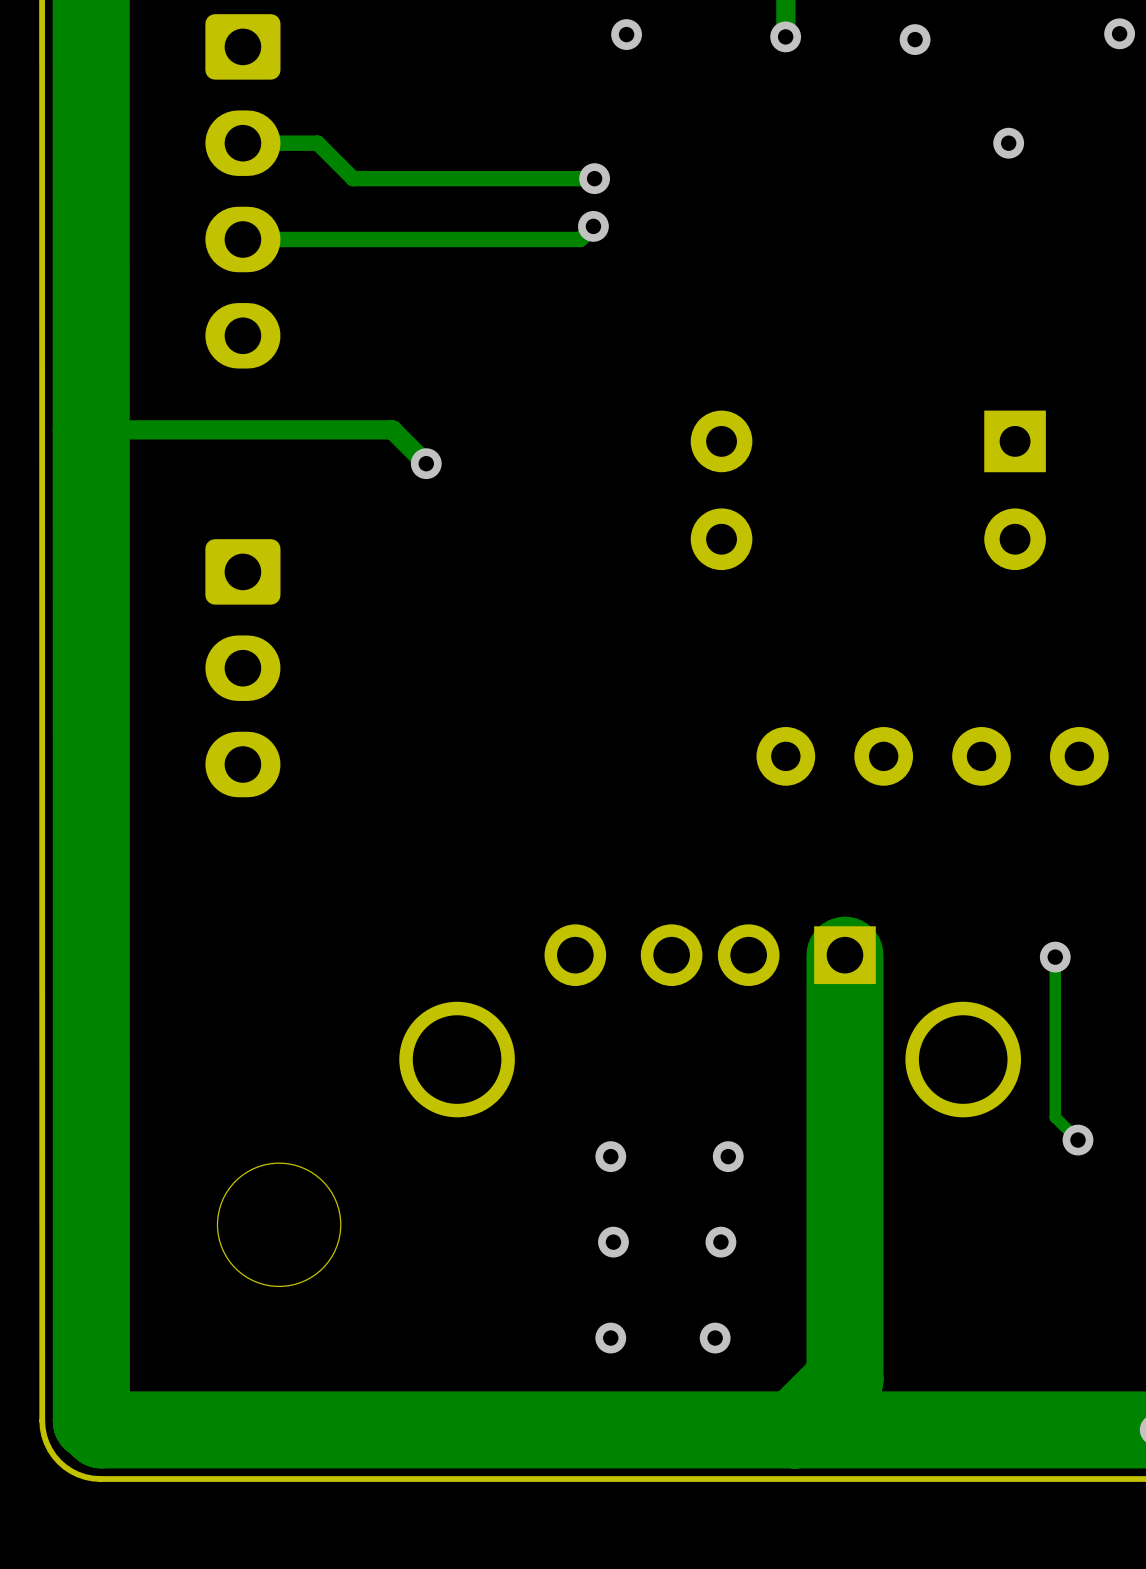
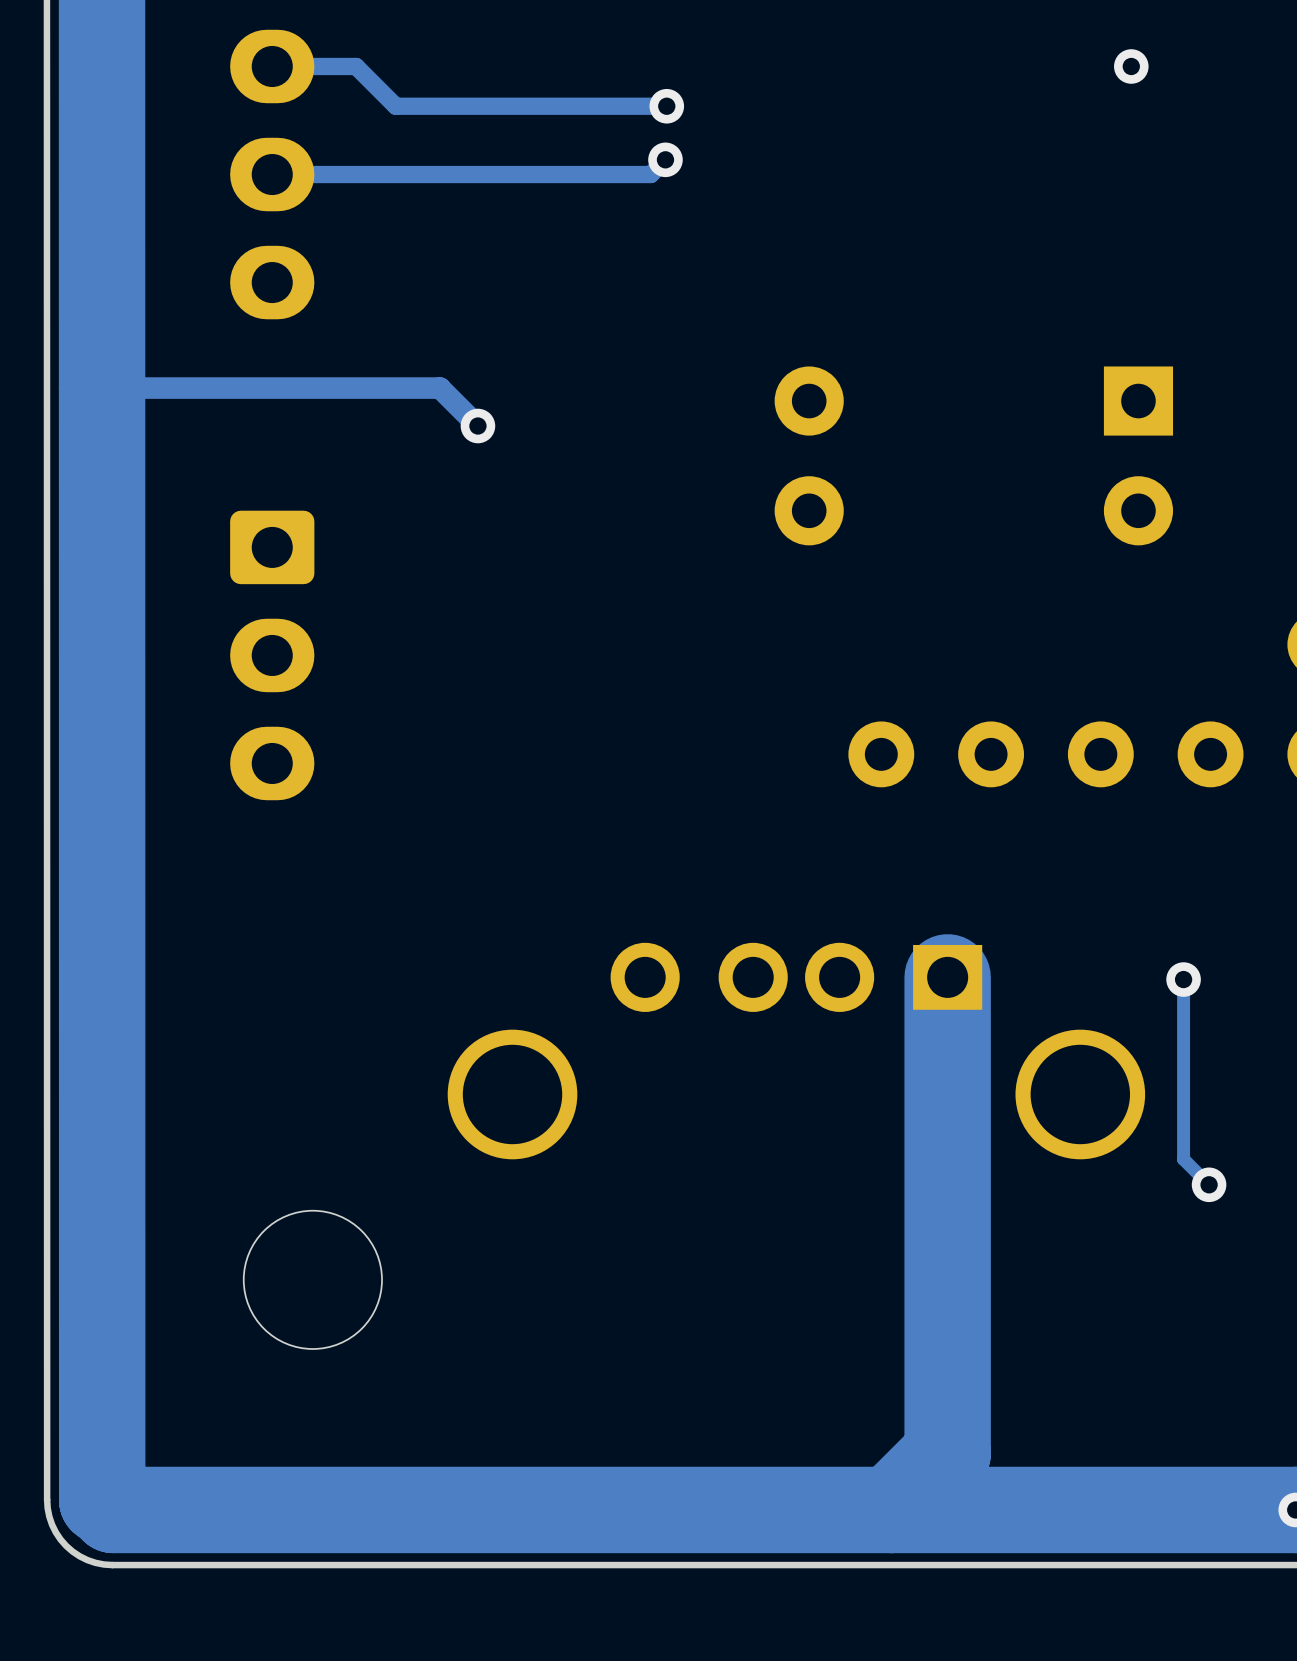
via: (610, 1156) -> none
via: (728, 1156) -> none
via: (613, 1242) -> none
via: (720, 1242) -> none
via: (610, 1338) -> none
via: (715, 1338) -> none

